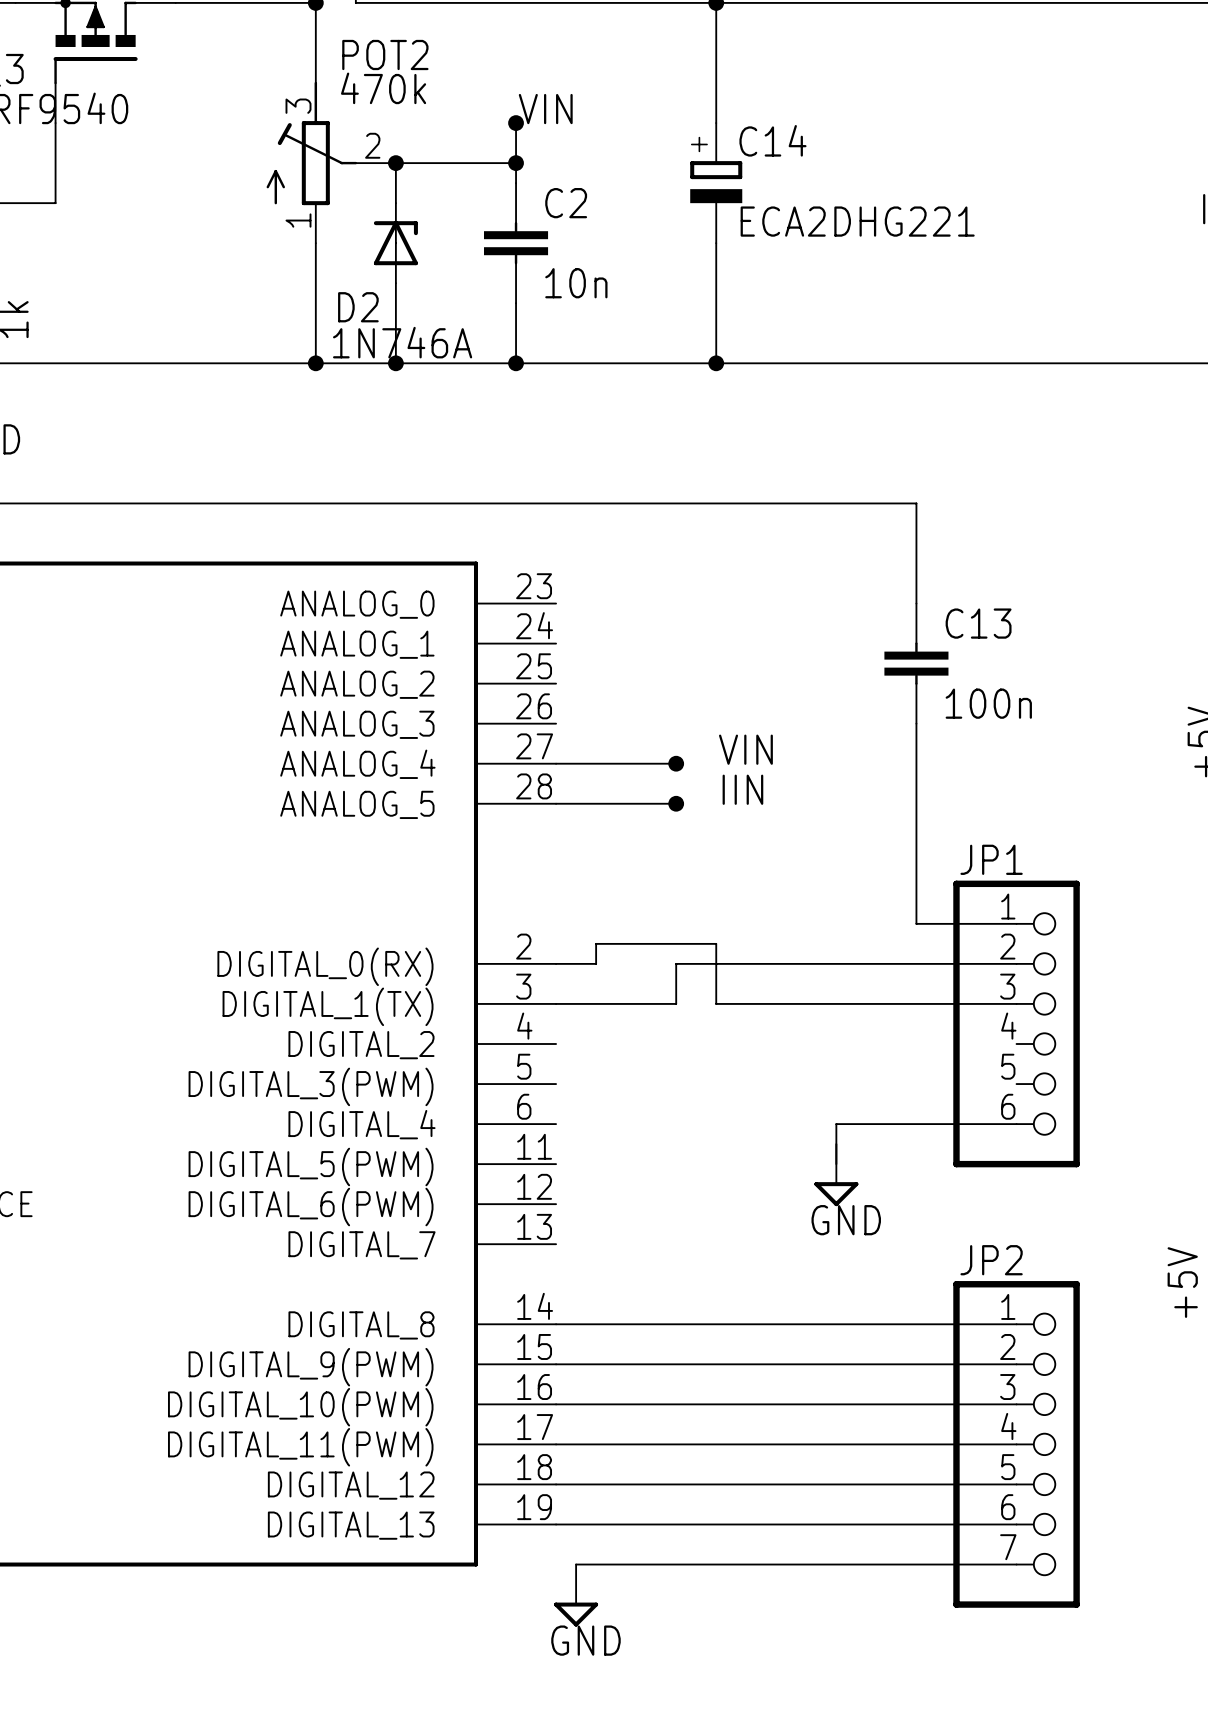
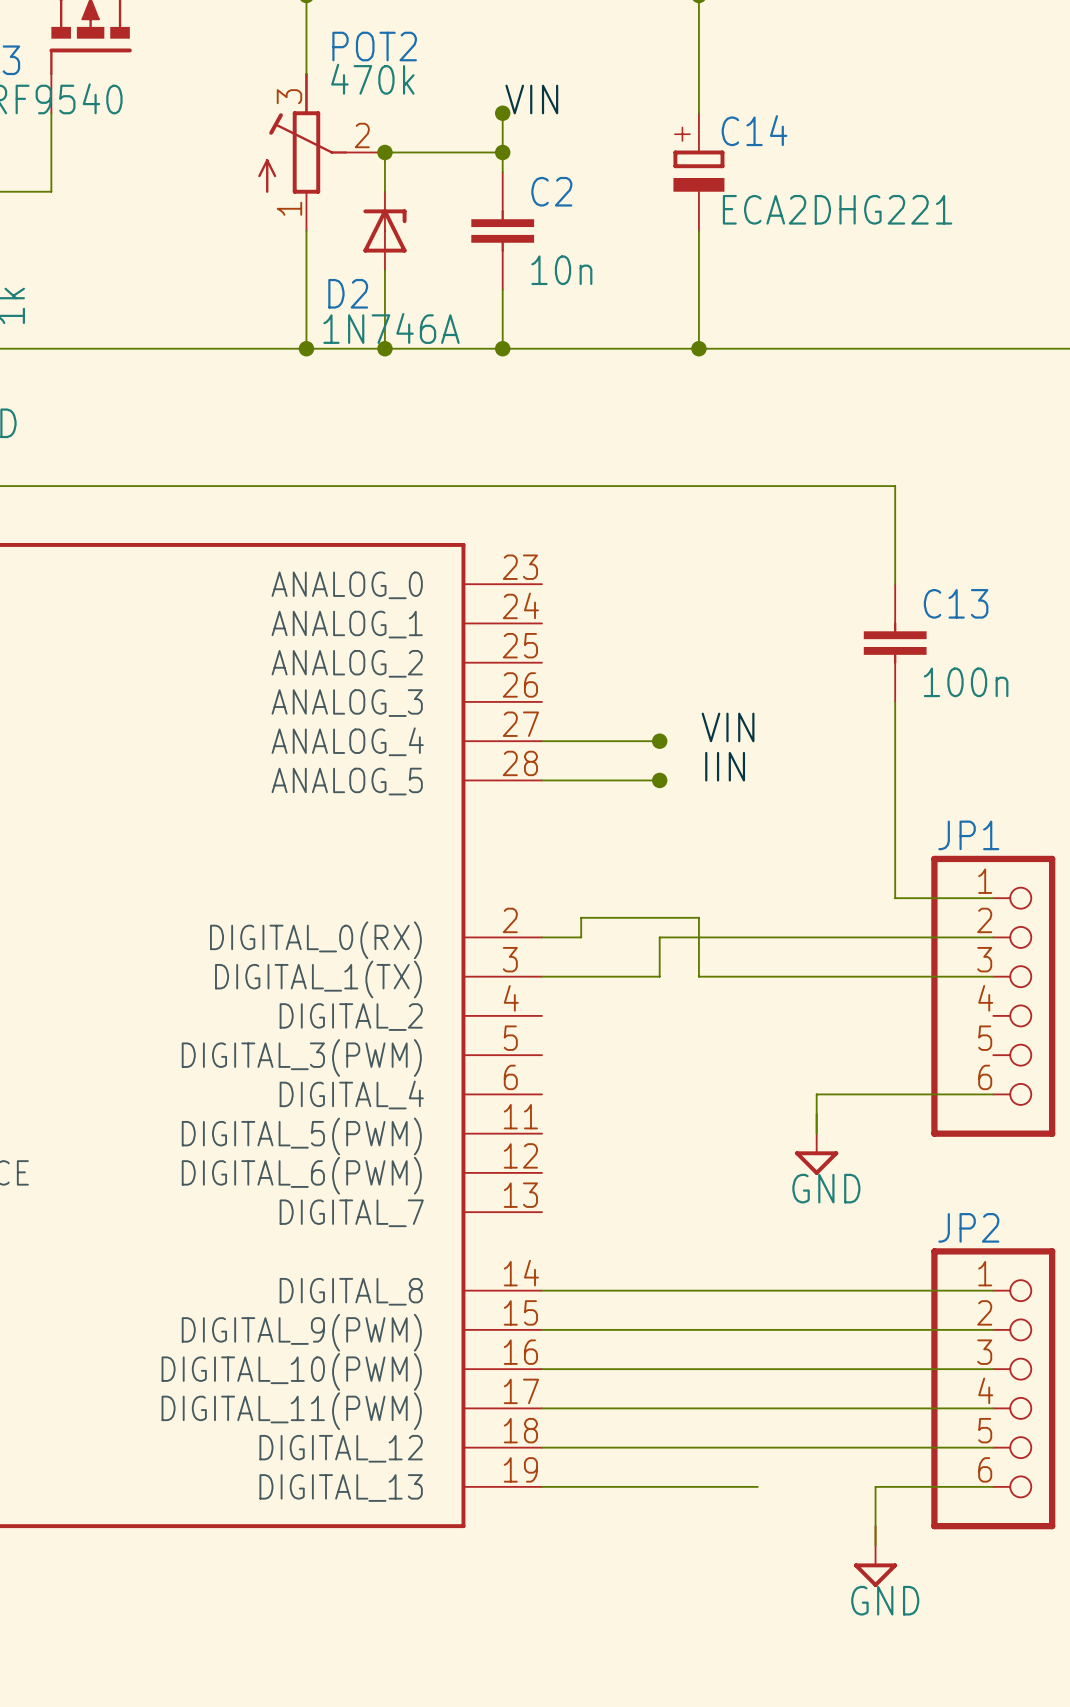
JP2 symbol: [953, 1281, 1080, 1608] -> [931, 1248, 1056, 1530]
wire: (776, 1524) (896, 1524) -> (875, 1545) (875, 1486)
wire: (576, 1564) (1016, 1564) -> none
power symbol: GND (576, 1595) -> none
power symbol: none -> GND (875, 1556)

